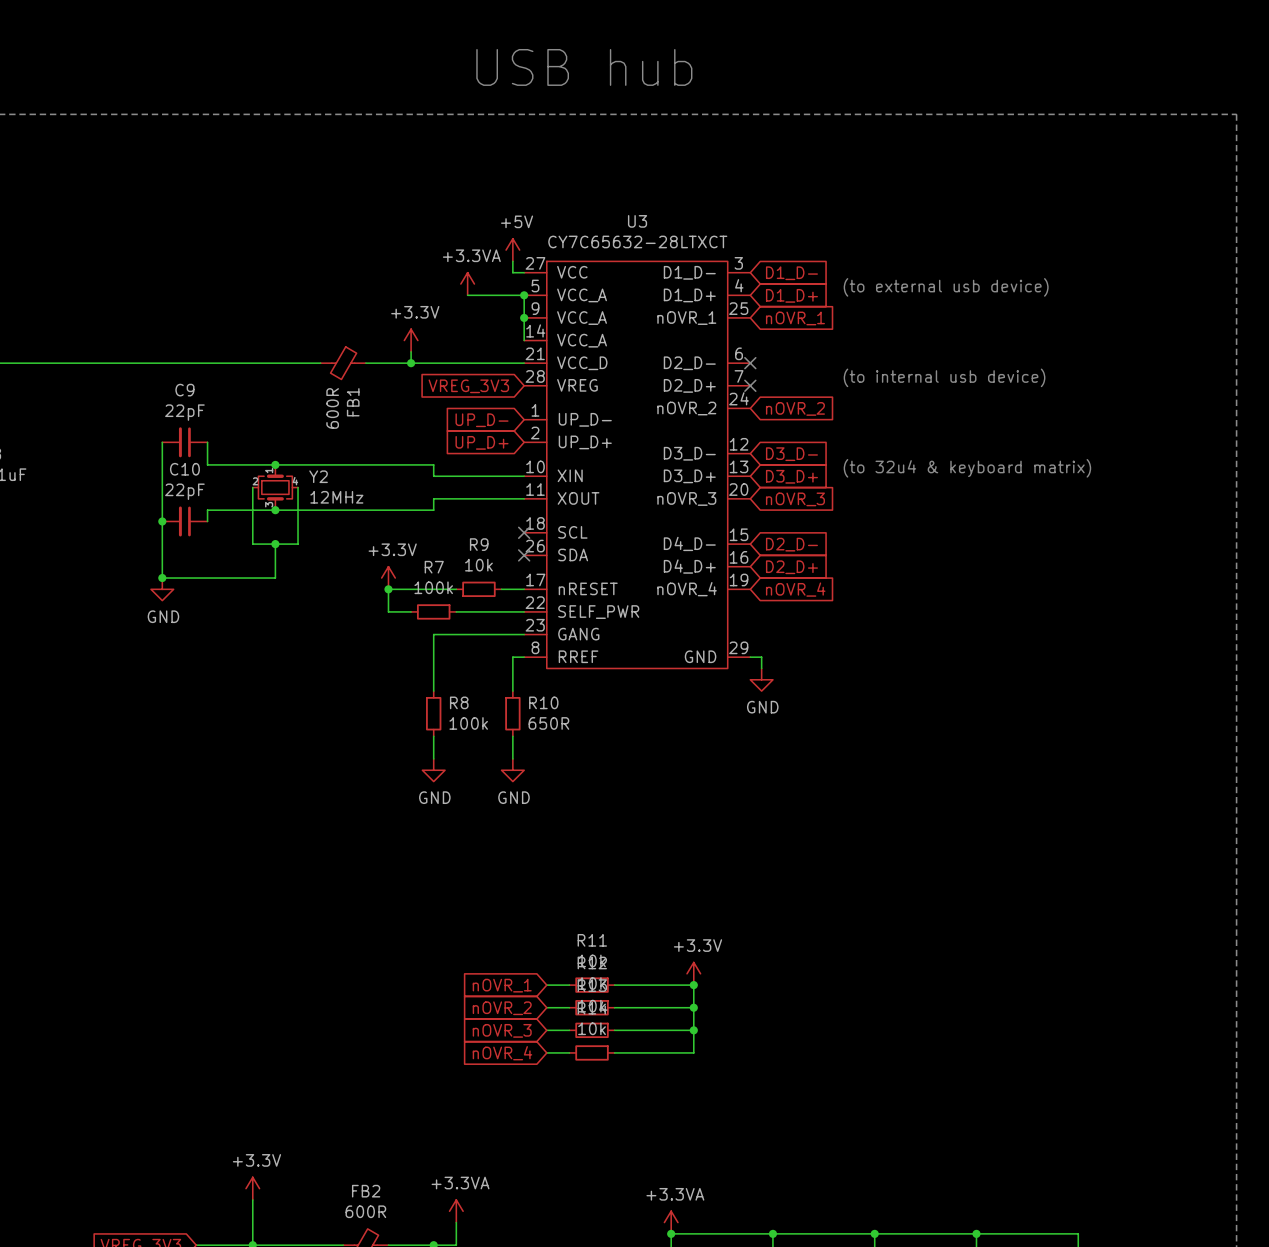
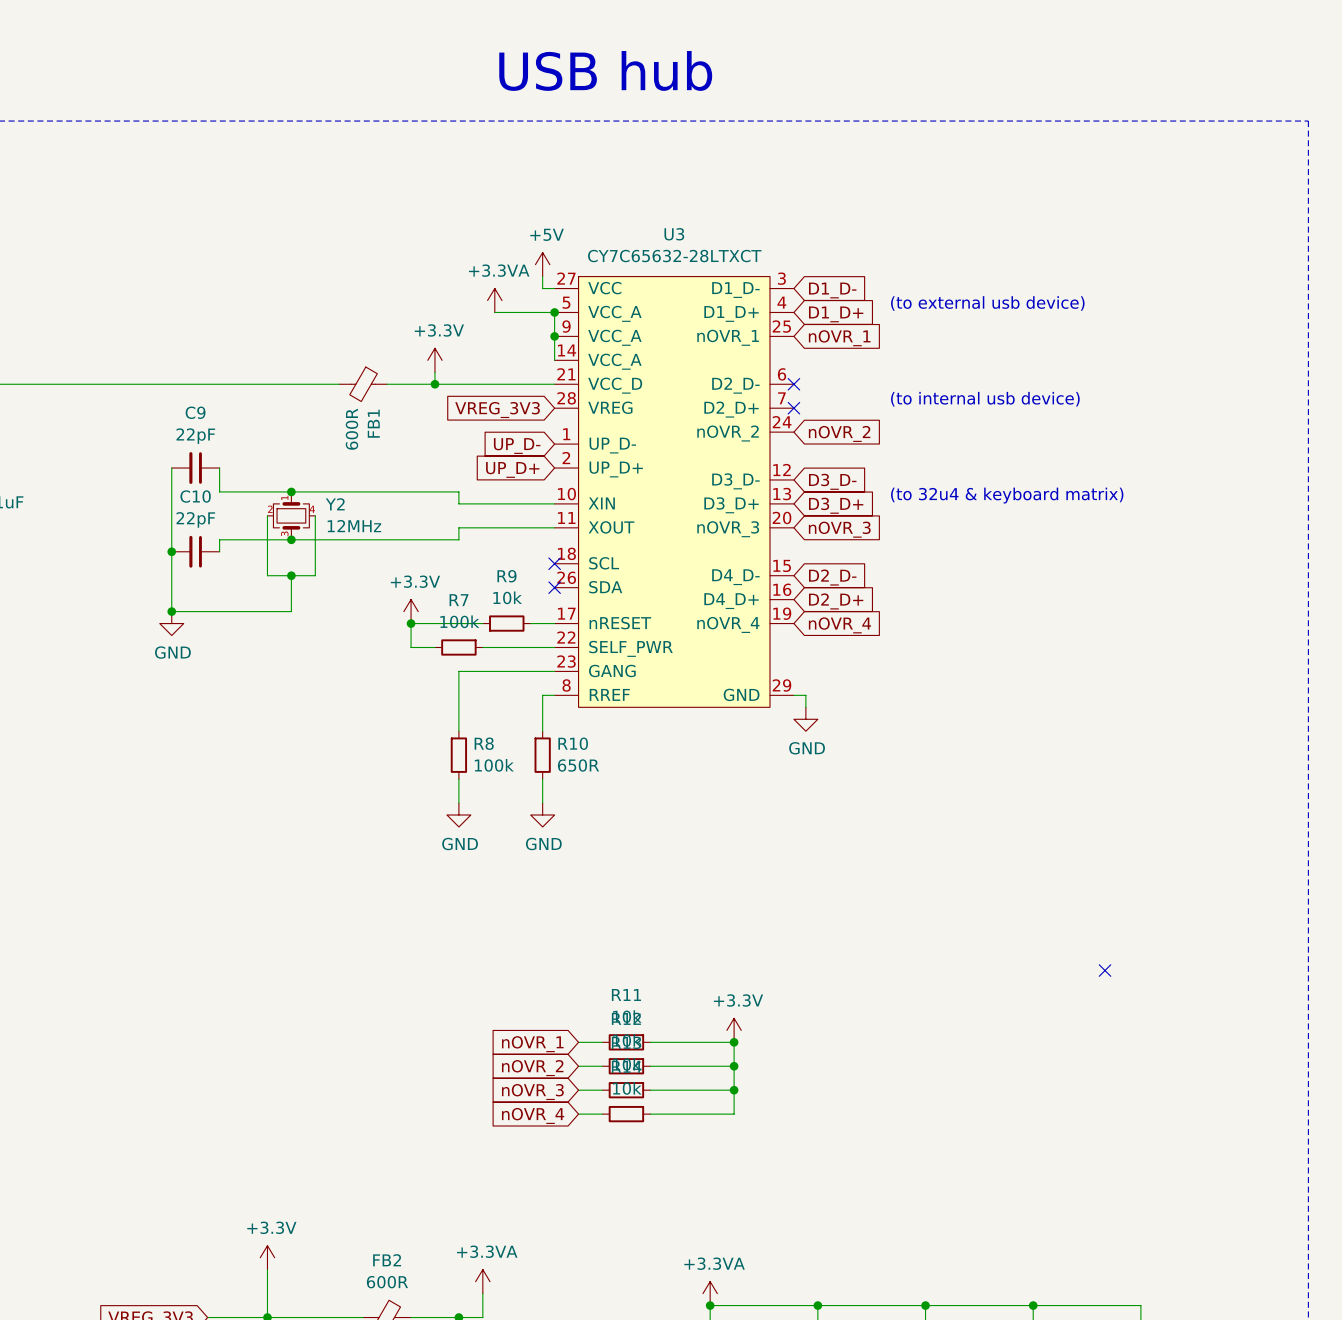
no-connect mark: none -> (1105, 970)

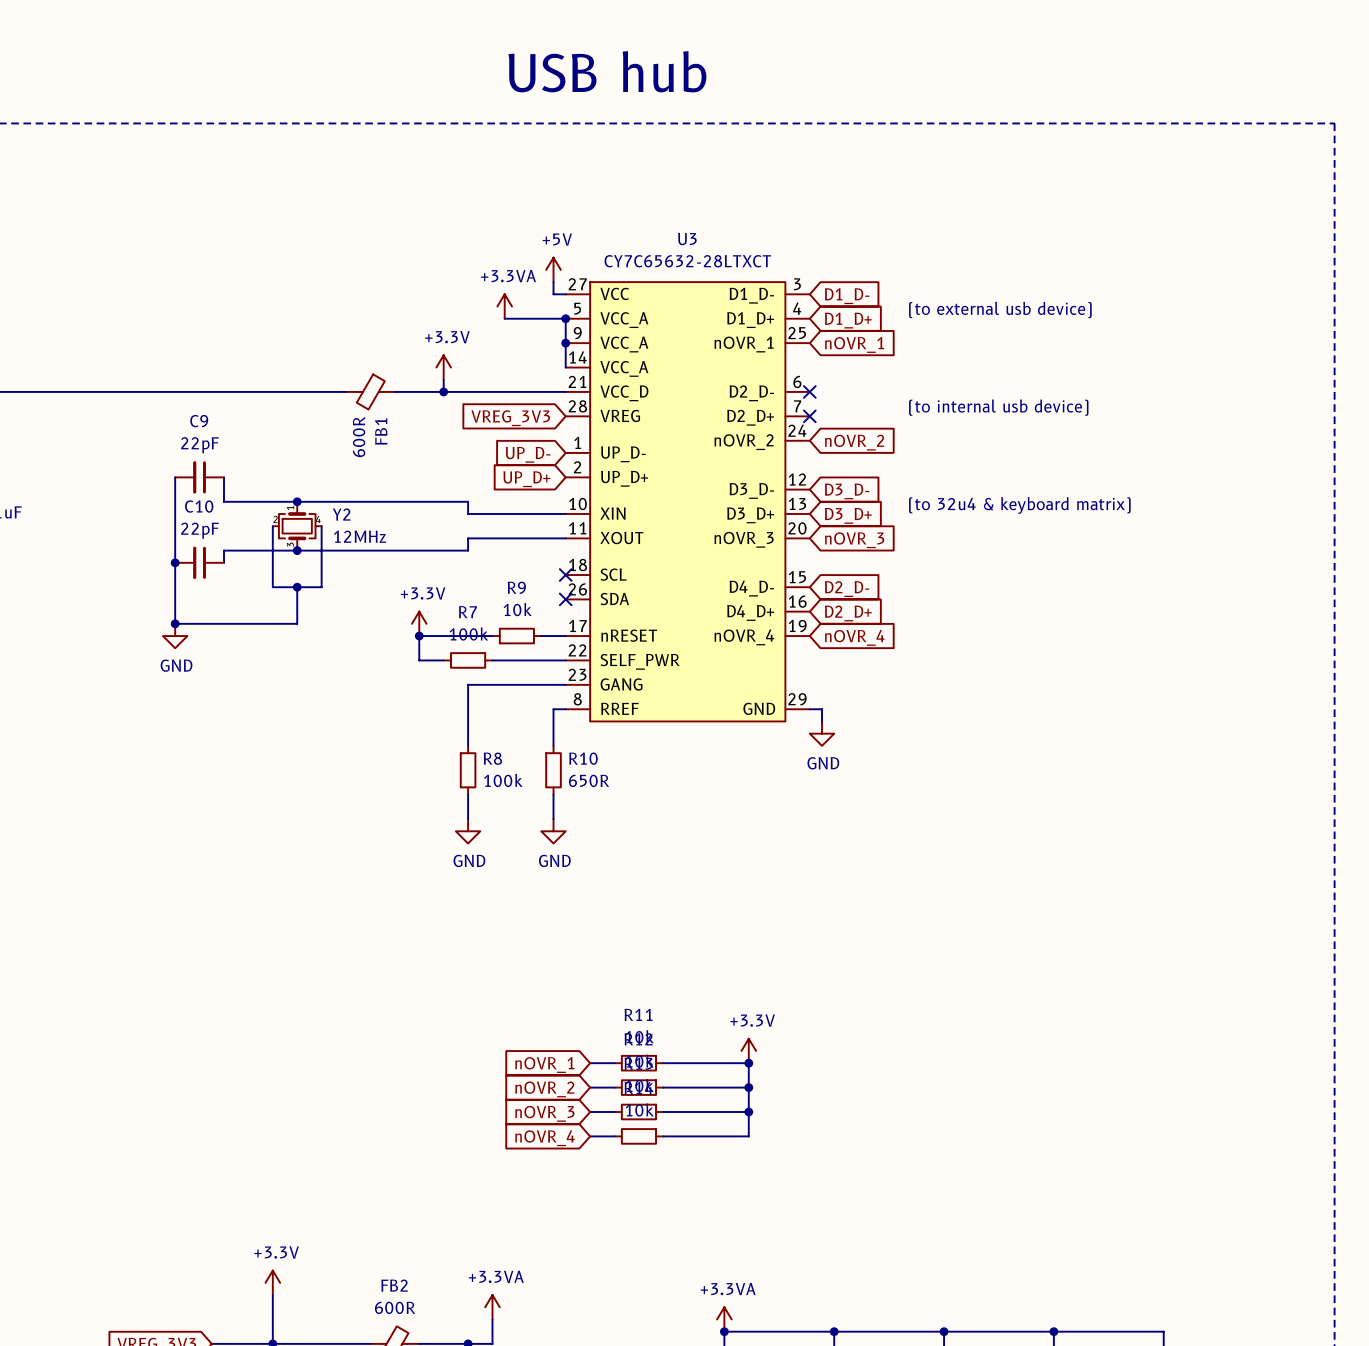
no-connect mark: (1105, 970) -> none

